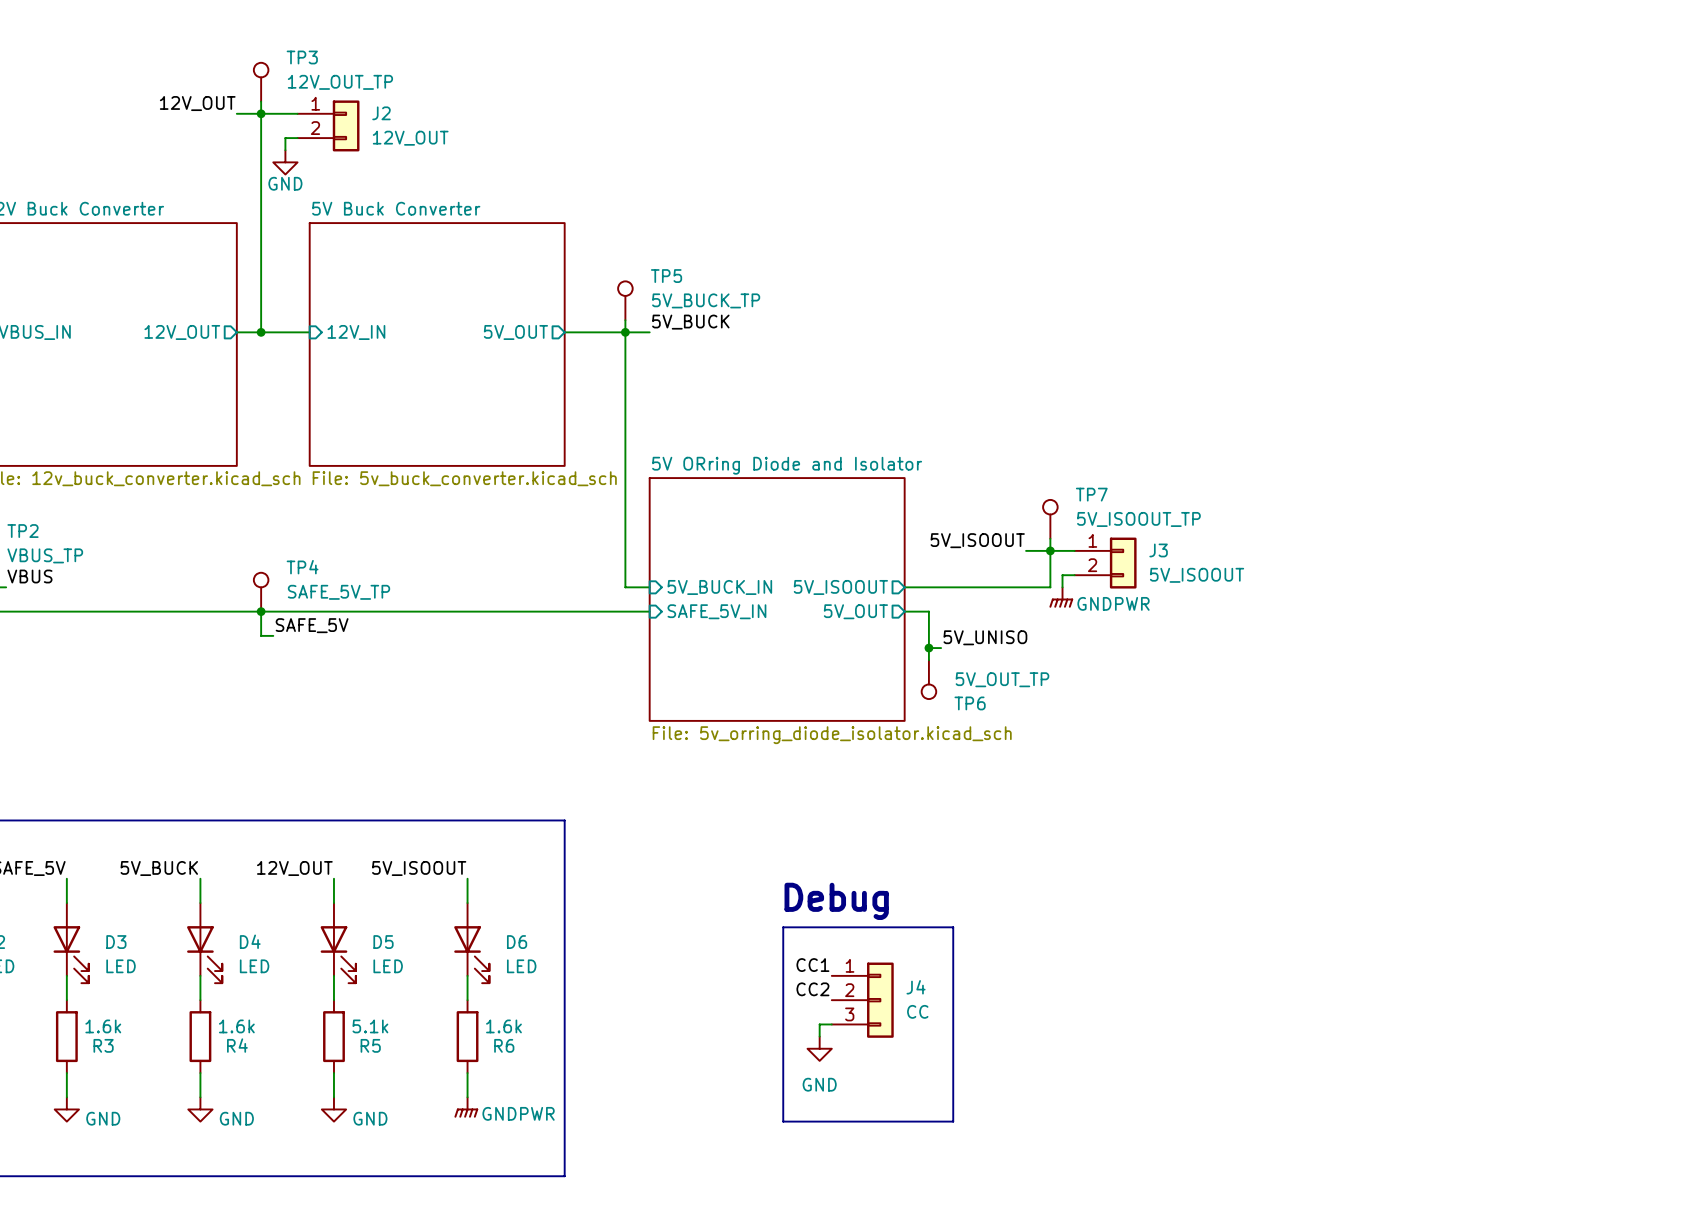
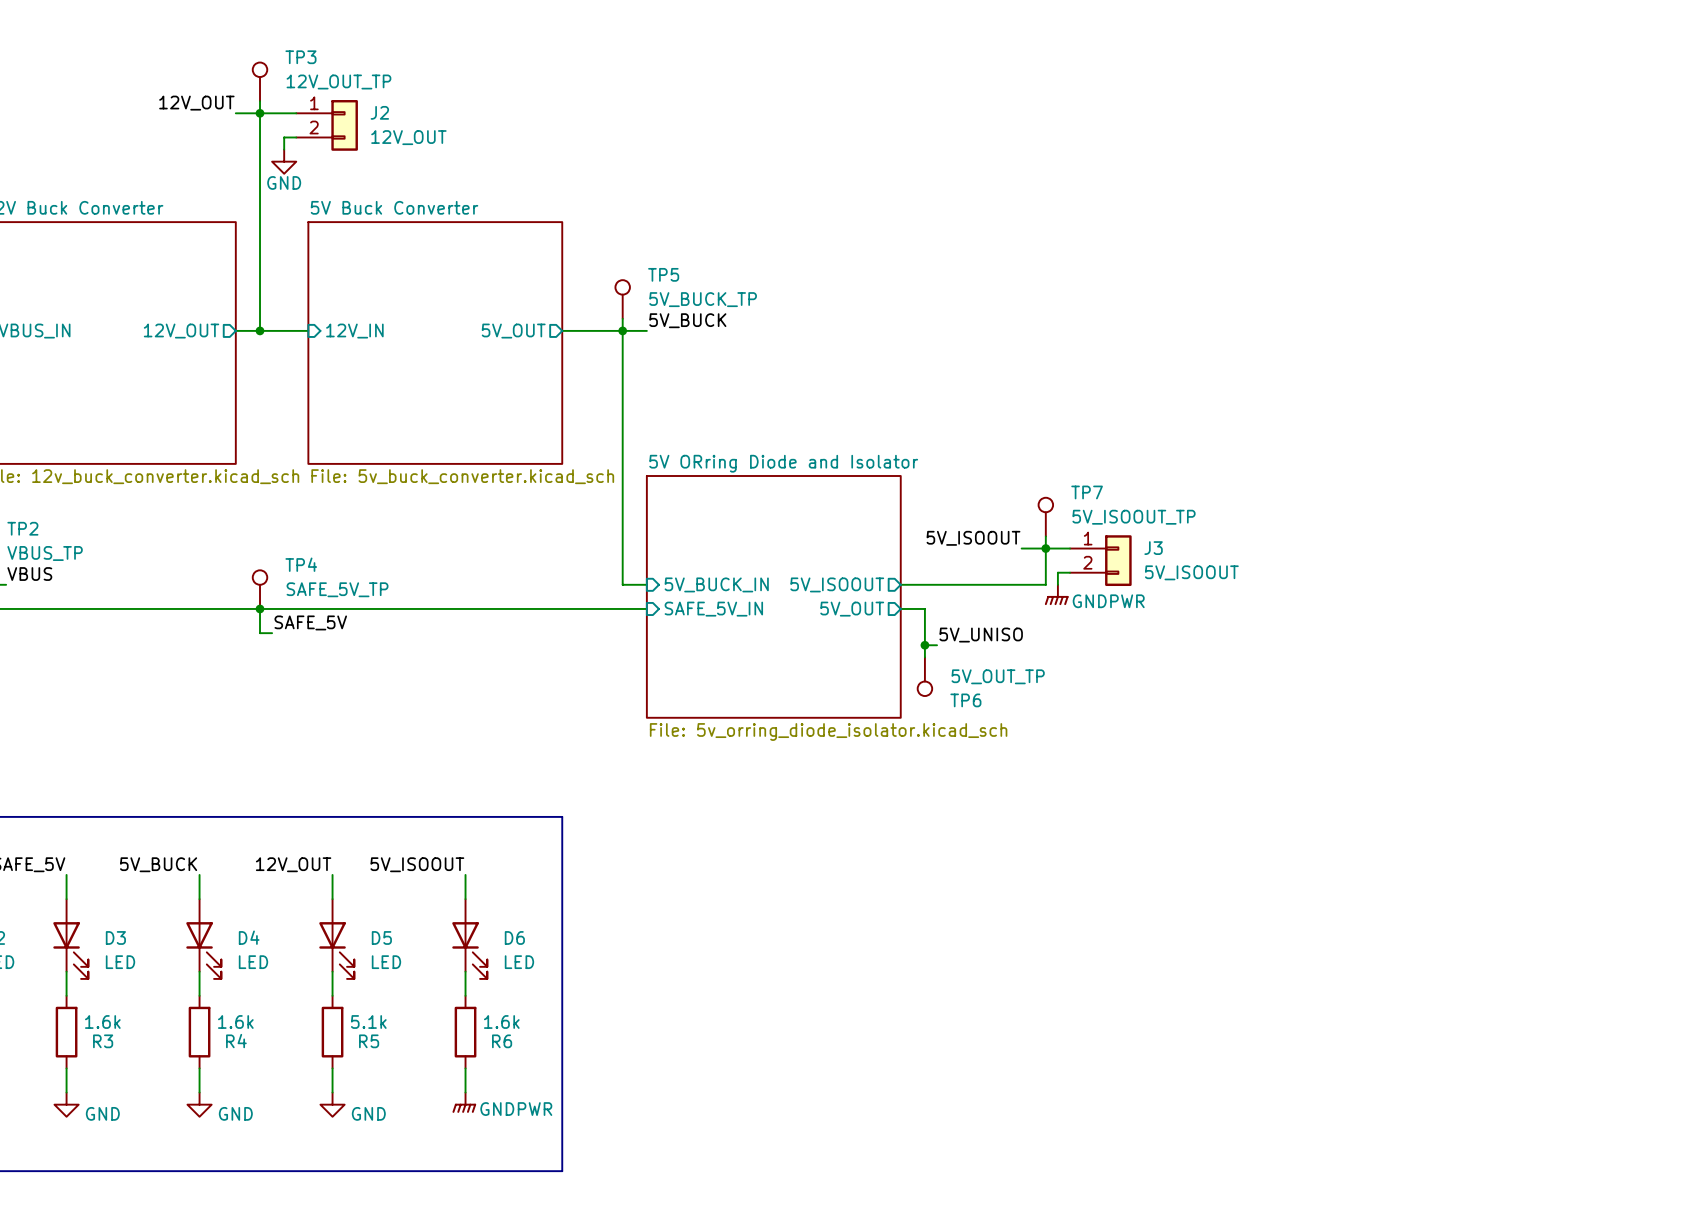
text: Debug (836, 901) -> none
line: (783, 927) (953, 927) (953, 1121) (783, 1121) (783, 927) -> none
label: CC1 (812, 965) -> none
label: CC2 (812, 989) -> none
J4: CC (862, 1000) -> none
wire: (831, 1024) (819, 1024) (819, 1036) -> none
power symbol: GND (819, 1048) -> none

